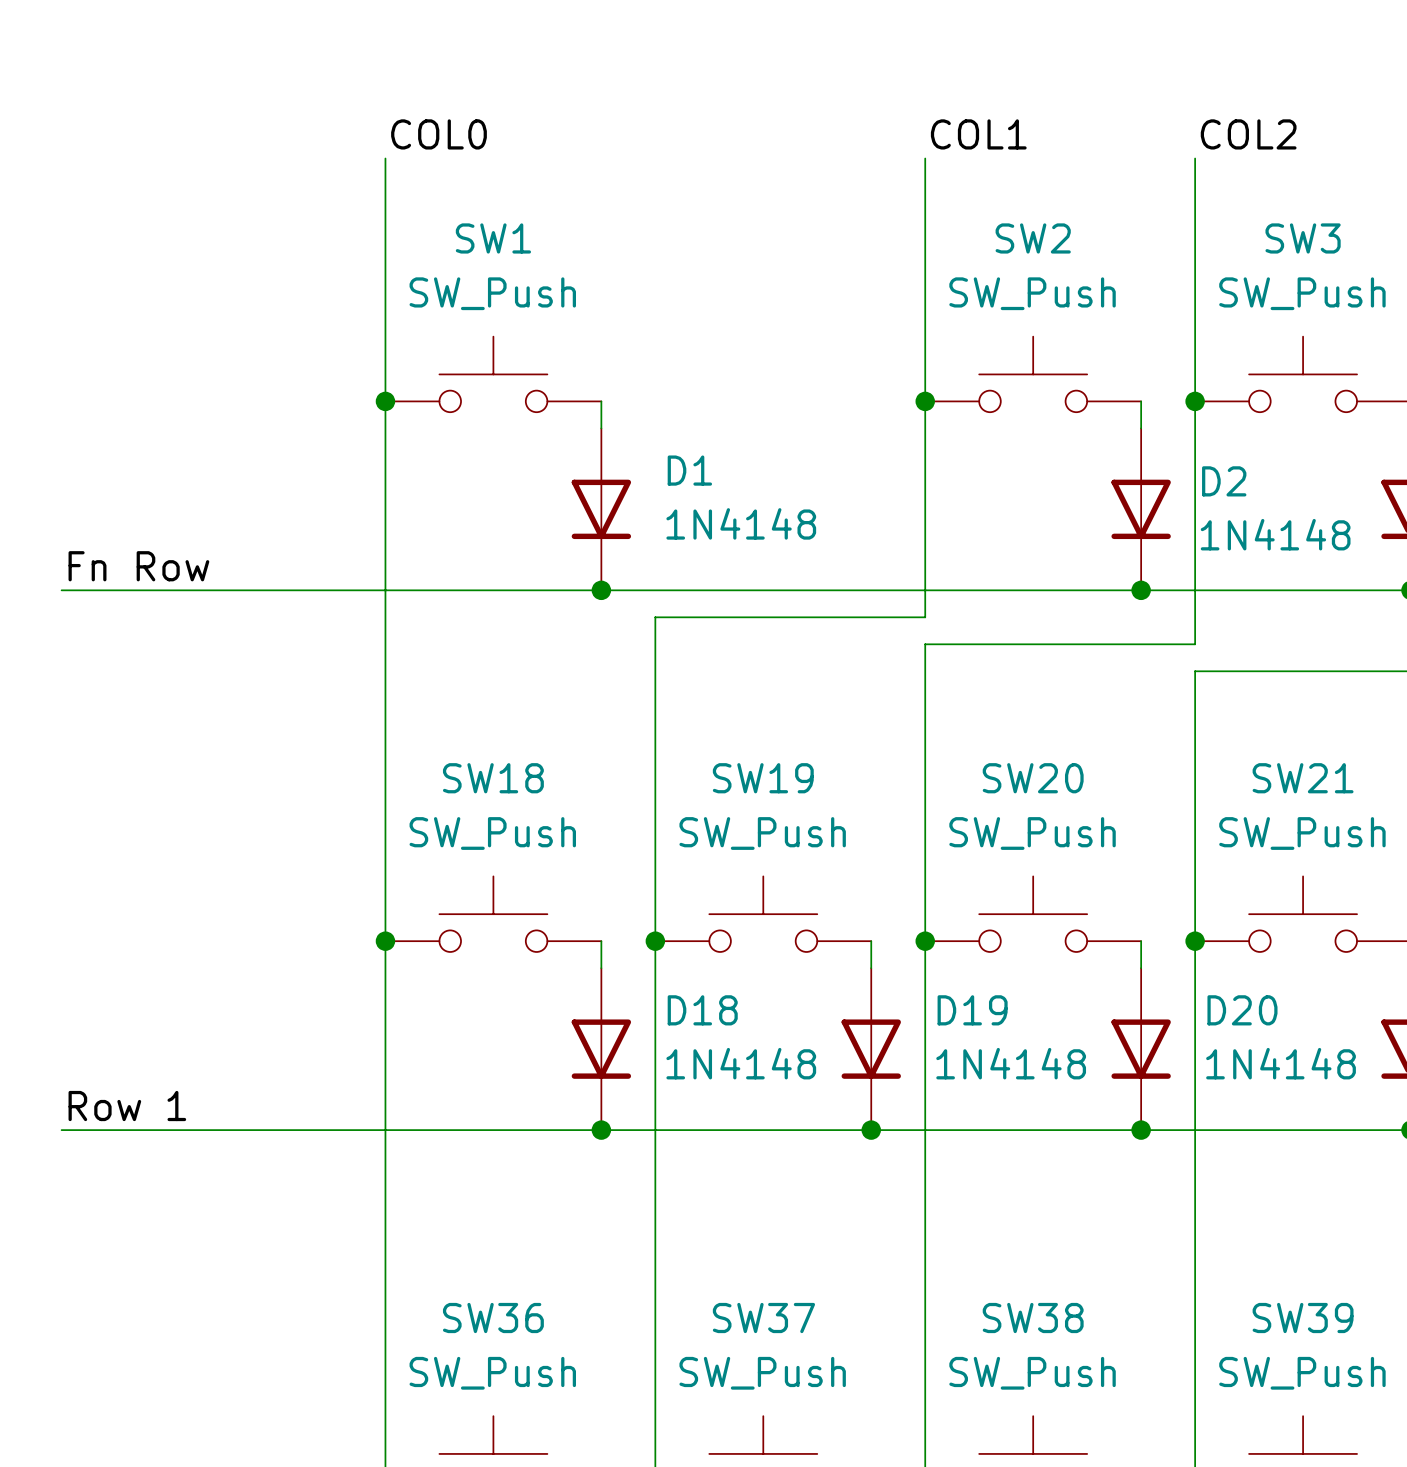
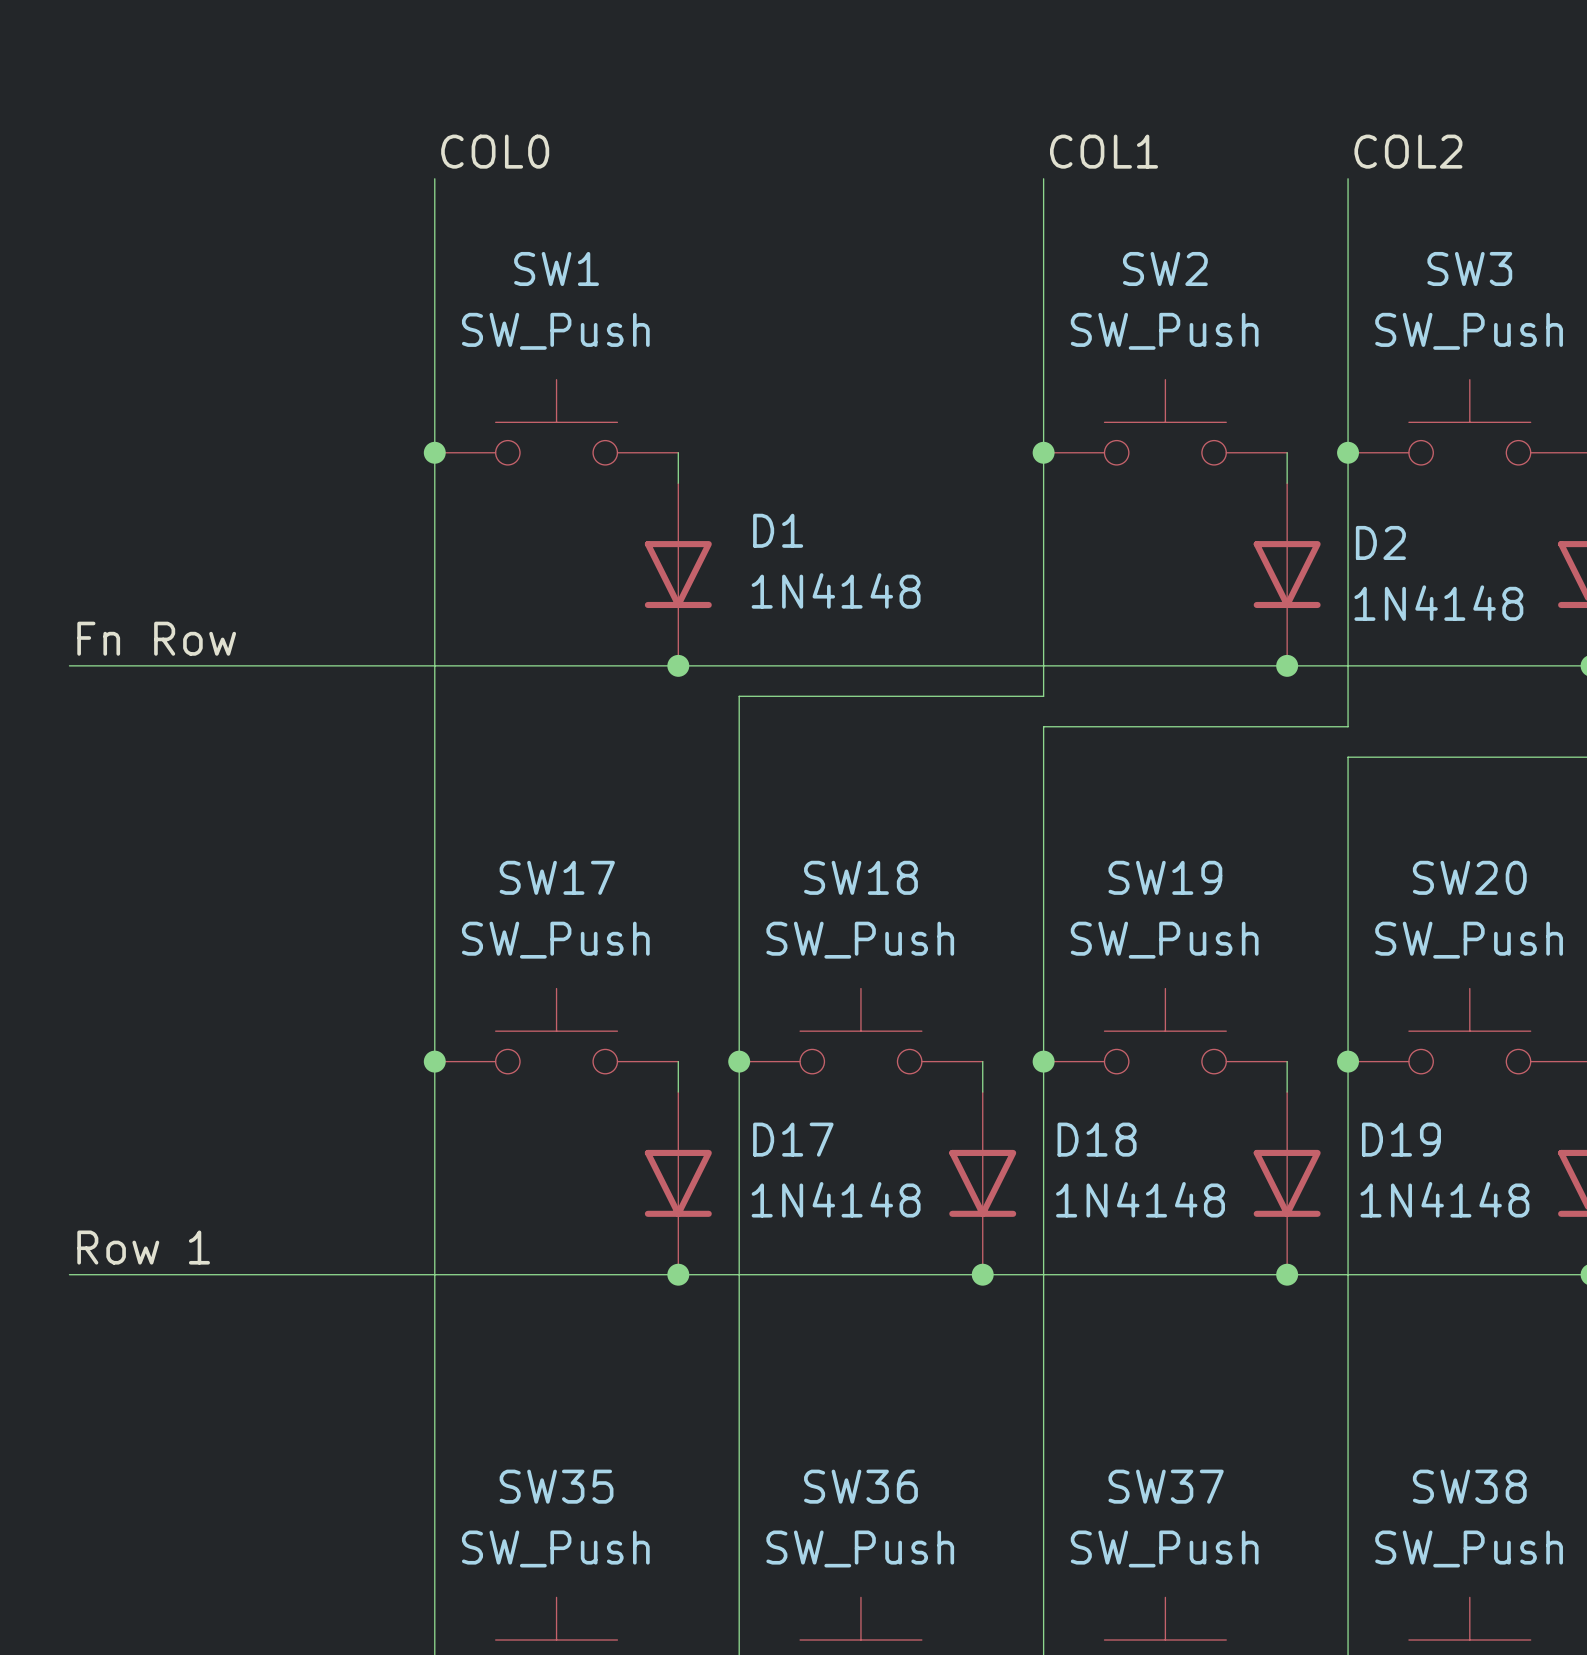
SW18 name: SW18 (493, 778) -> SW17 (557, 877)
SW19 name: SW19 (763, 778) -> SW18 (860, 877)
SW20 name: SW20 (1033, 778) -> SW19 (1165, 877)
SW21 name: SW21 (1303, 778) -> SW20 (1469, 877)
D18 name: D18 (702, 1010) -> D17 (793, 1139)
D19 name: D19 (972, 1010) -> D18 (1097, 1139)
D20 name: D20 (1242, 1010) -> D19 (1401, 1139)
SW36 name: SW36 (493, 1318) -> SW35 (556, 1486)
SW37 name: SW37 (763, 1318) -> SW36 (860, 1486)
SW38 name: SW38 (1033, 1318) -> SW37 (1166, 1486)
SW39 name: SW39 (1303, 1318) -> SW38 (1469, 1486)

